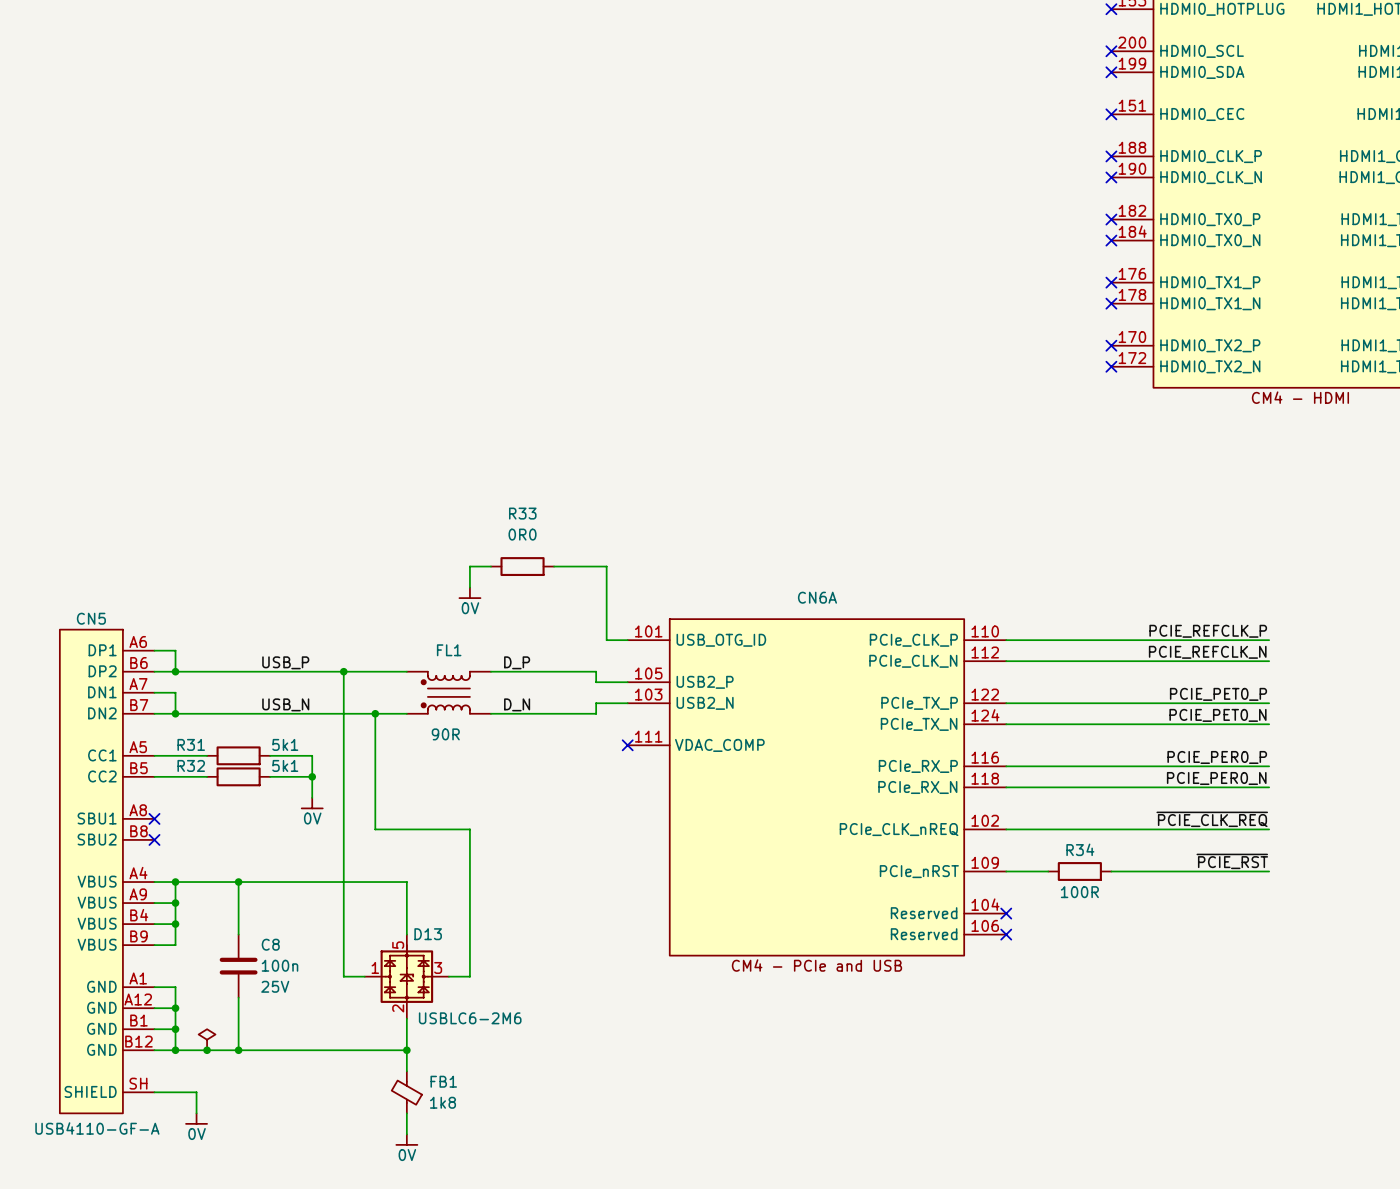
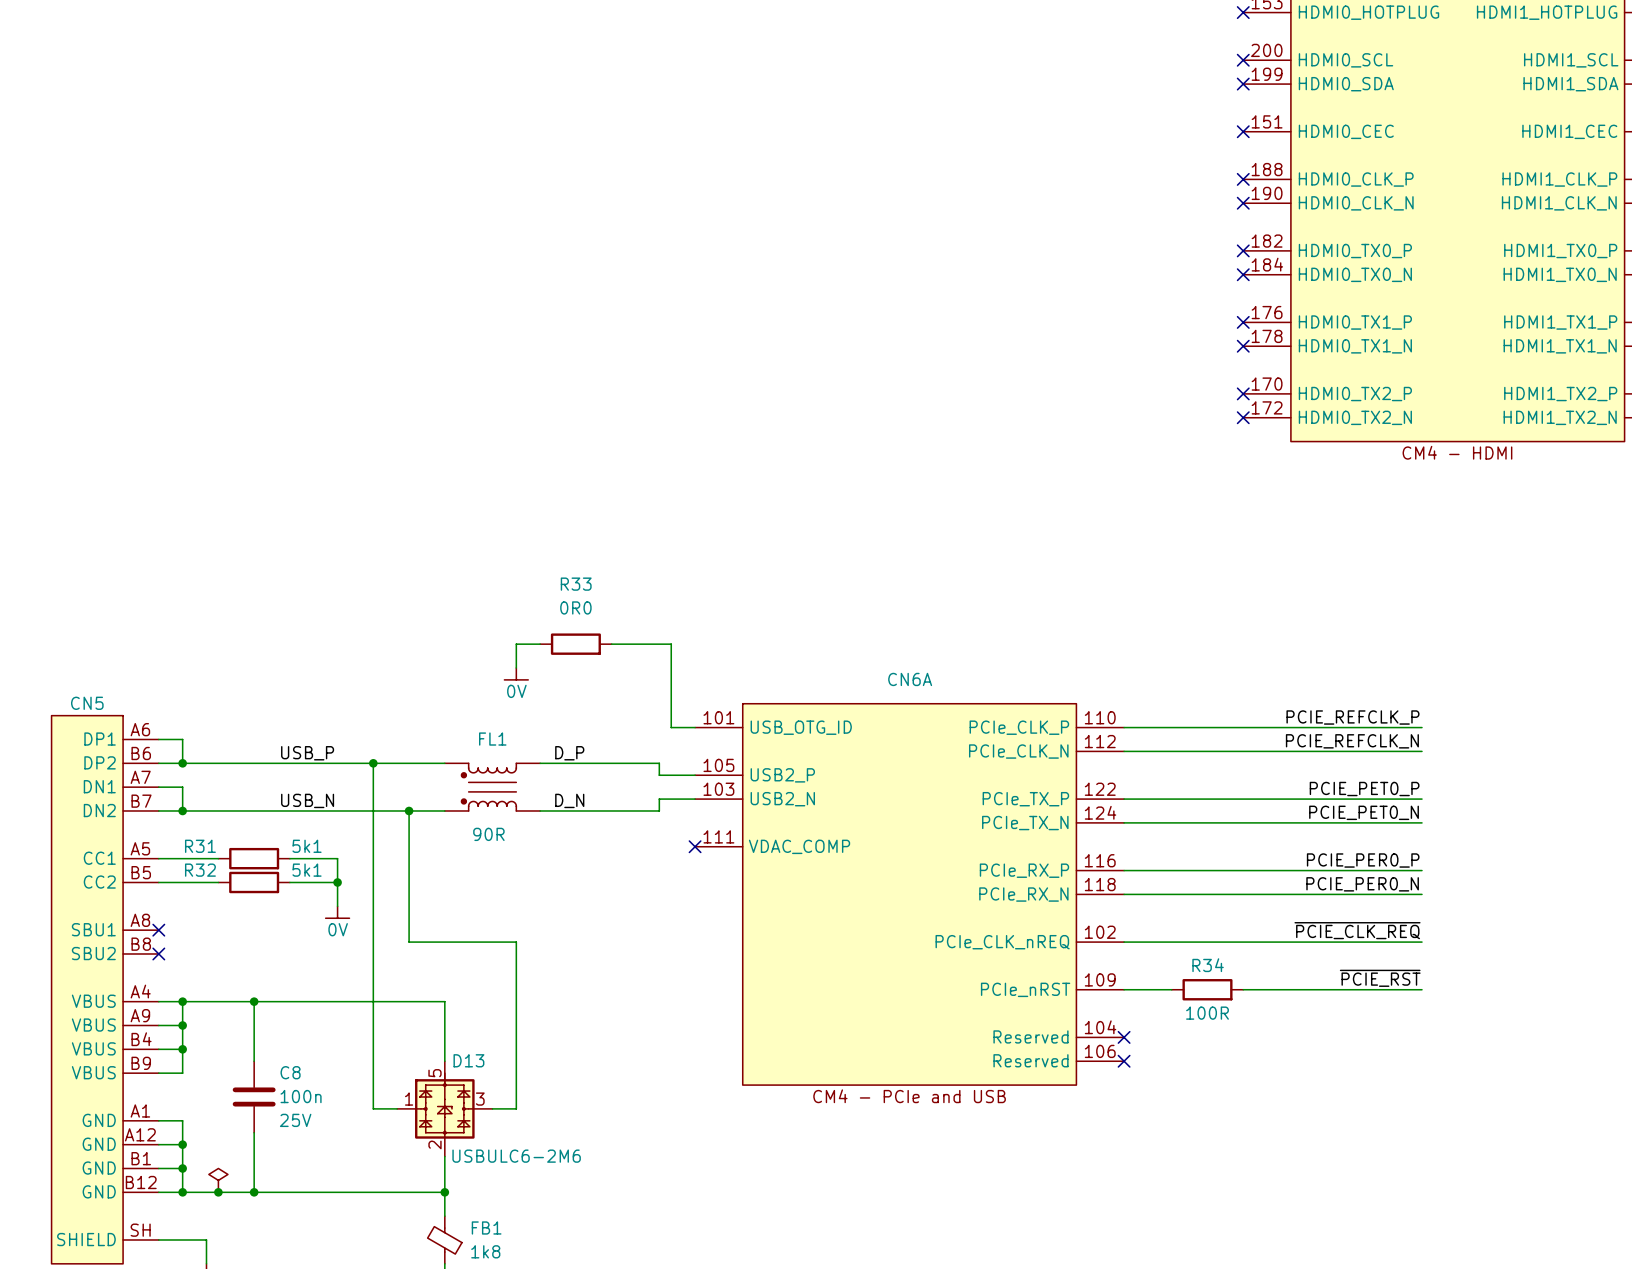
D13 value: USBLC6-2M6 (470, 1018) -> USBULC6-2M6 (516, 1156)

